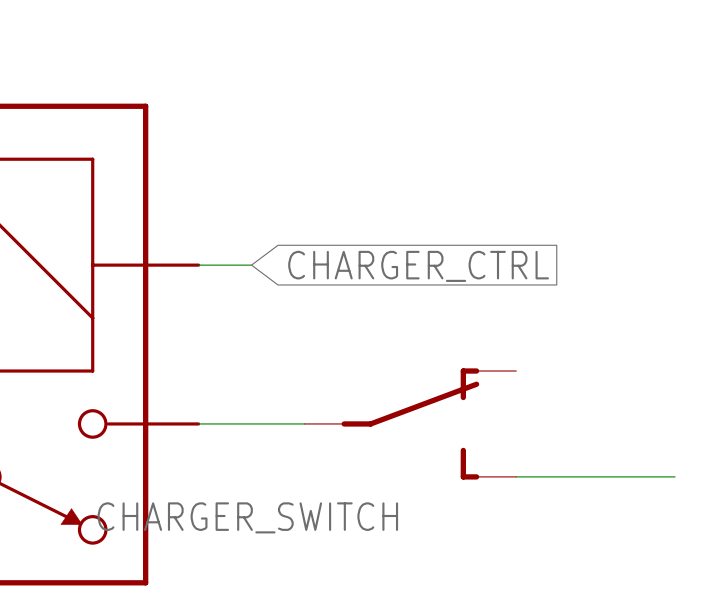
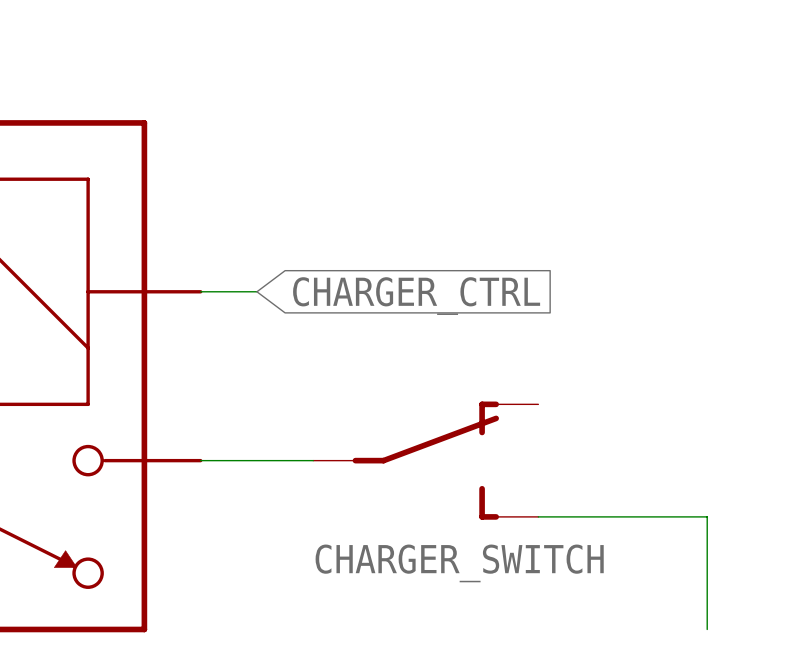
wire: none -> (707, 516) (707, 629)
CHARGER_SWITCH name position: CHARGER_SWITCH (247, 517) -> CHARGER_SWITCH (459, 563)

